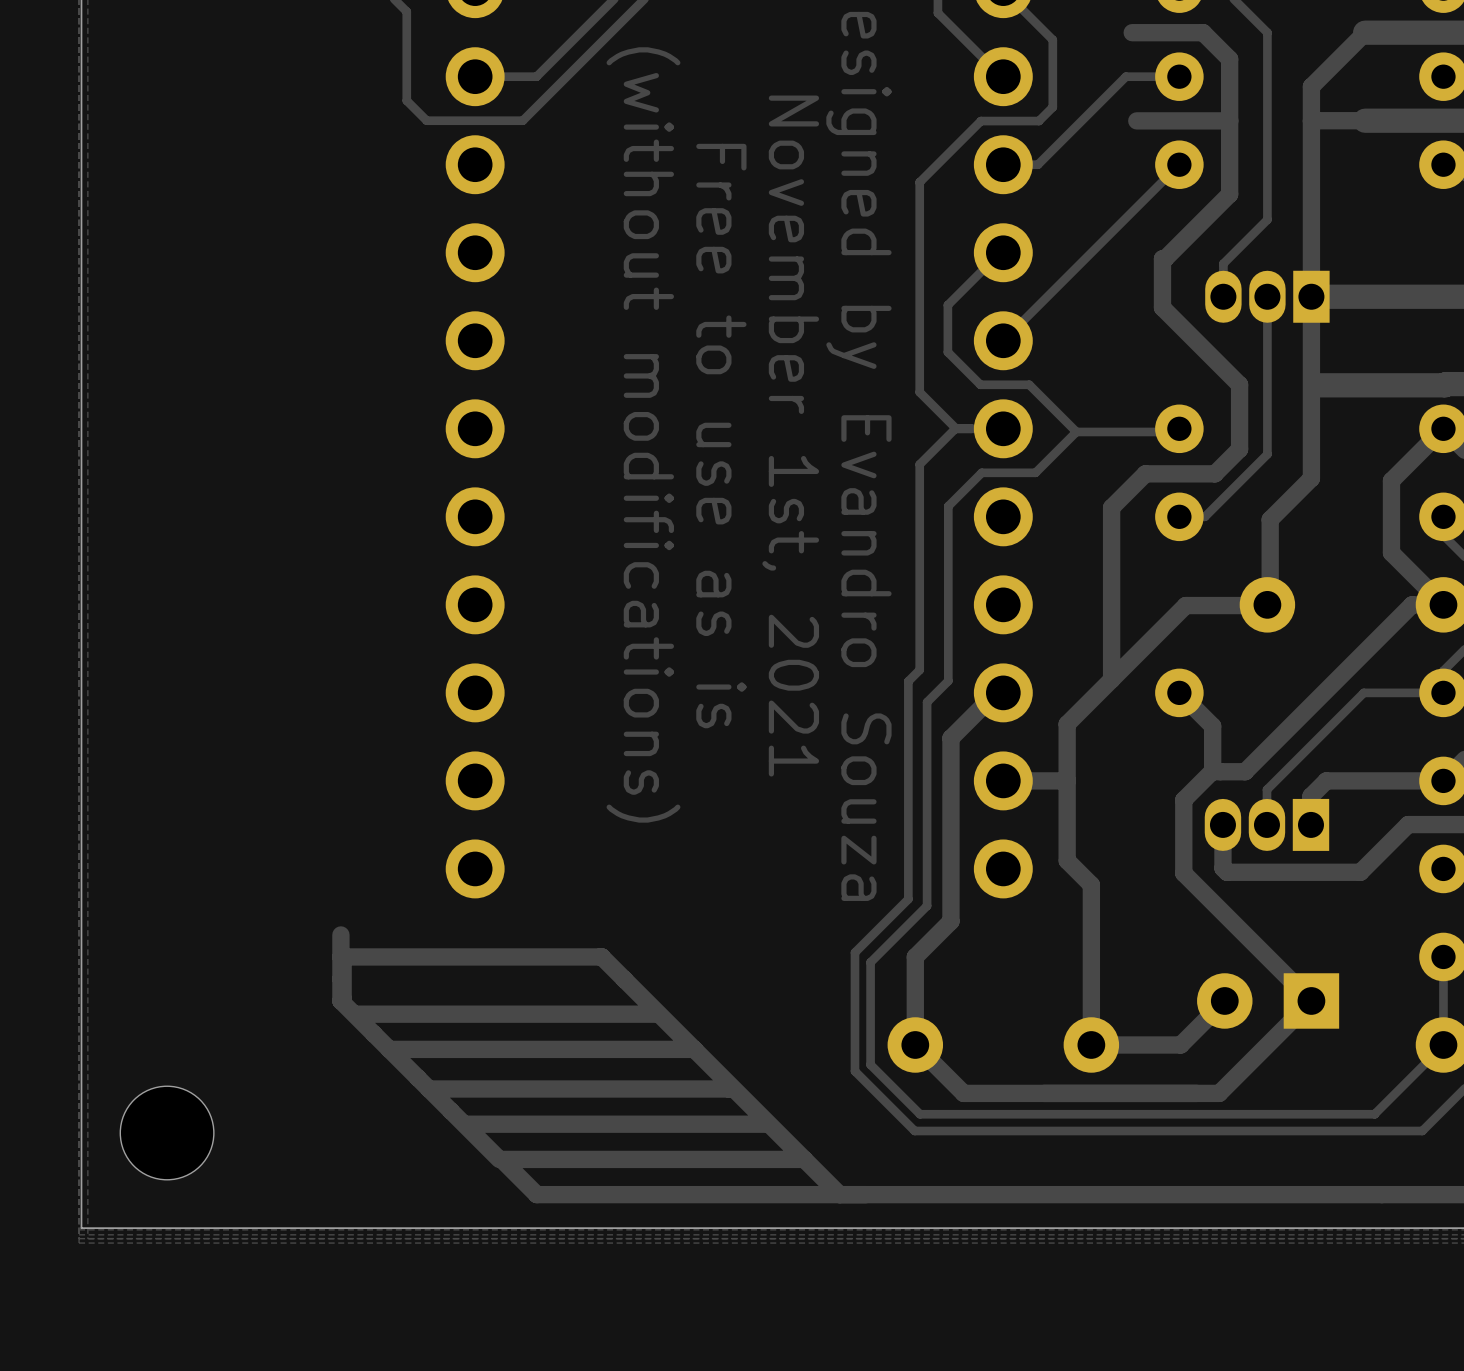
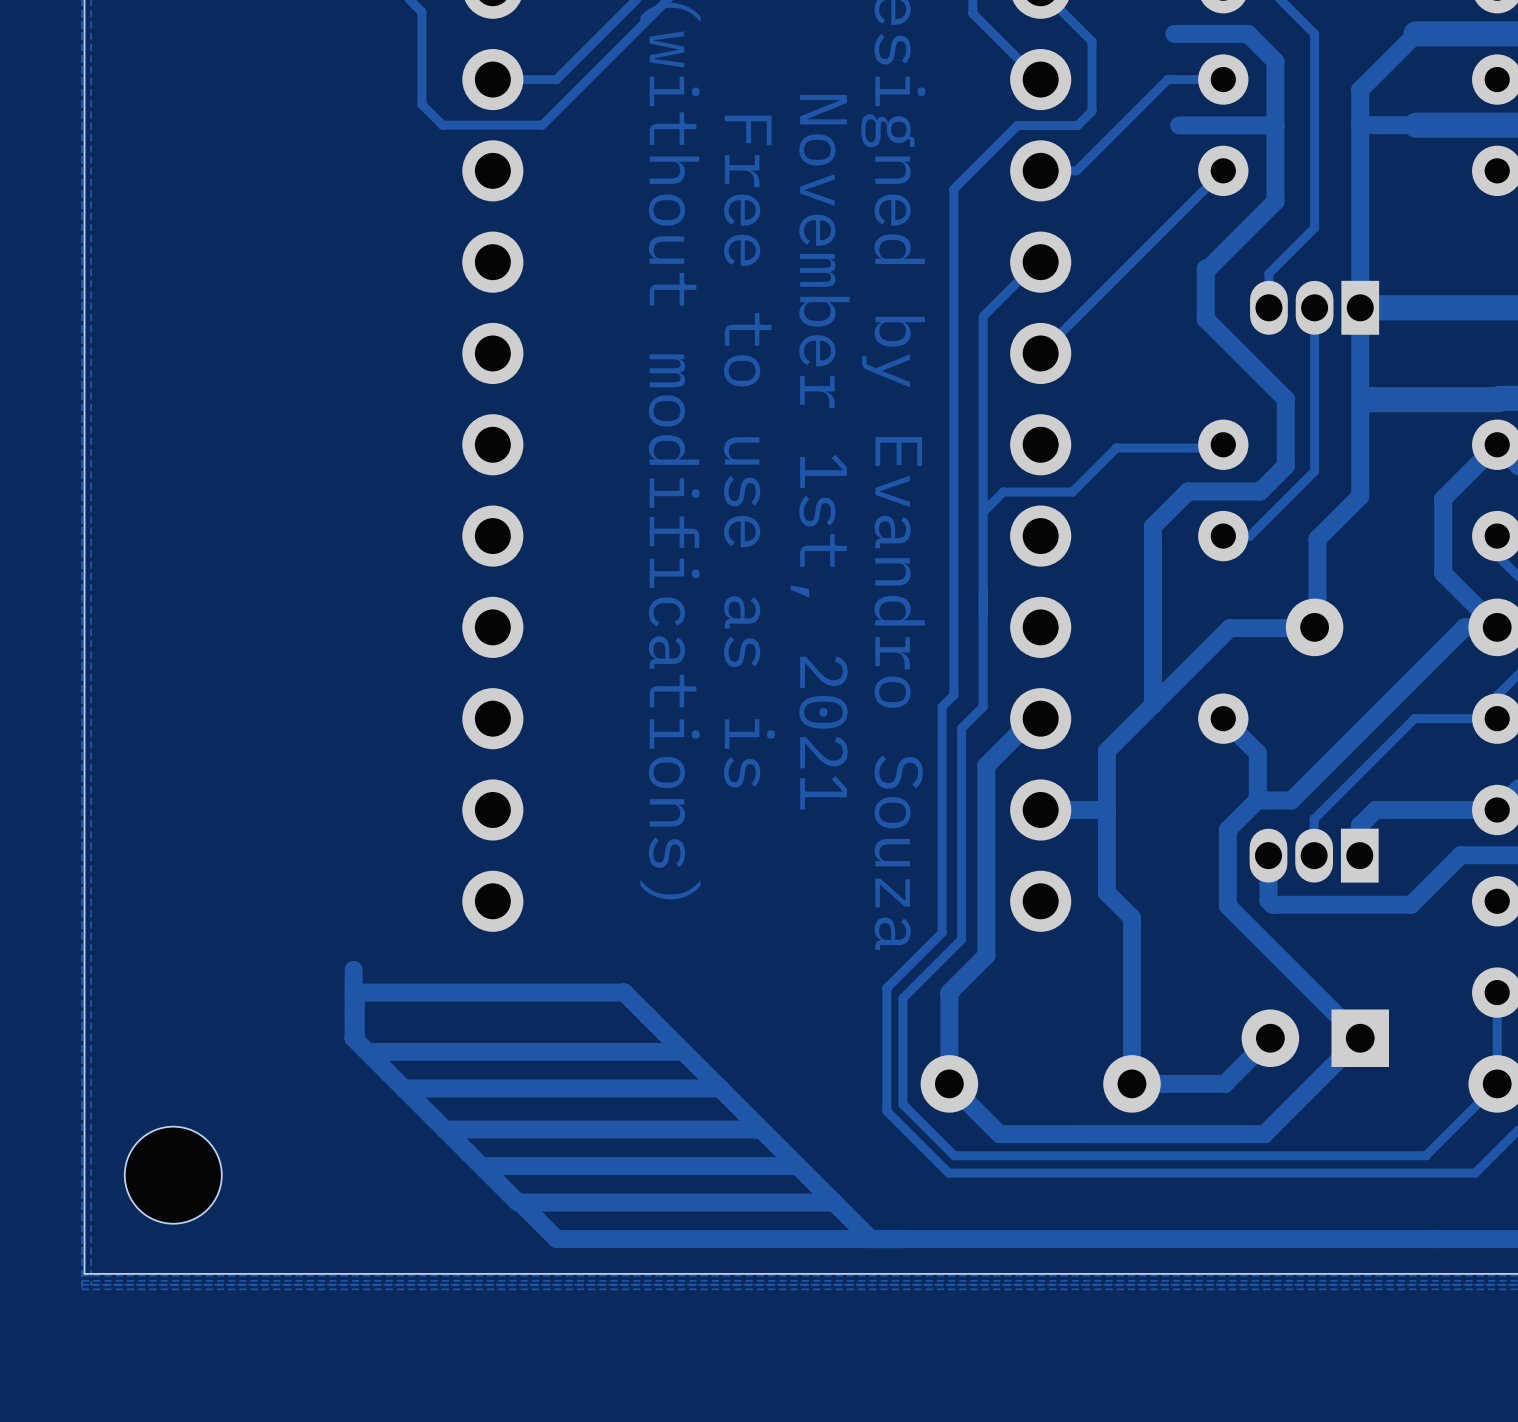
track: (947, 352) (980, 384) (1029, 384) (1076, 431) -> none
track: (919, 392) (956, 428) -> (953, 406) (953, 481)
track: (1003, 428) (955, 428) (919, 464) -> none
track: (1035, 472) (981, 472) (948, 506) (948, 681) -> (983, 365) (983, 706)
track: none -> (1074, 490) (1072, 492) (1003, 492)
track: none -> (1003, 491) (983, 512)

